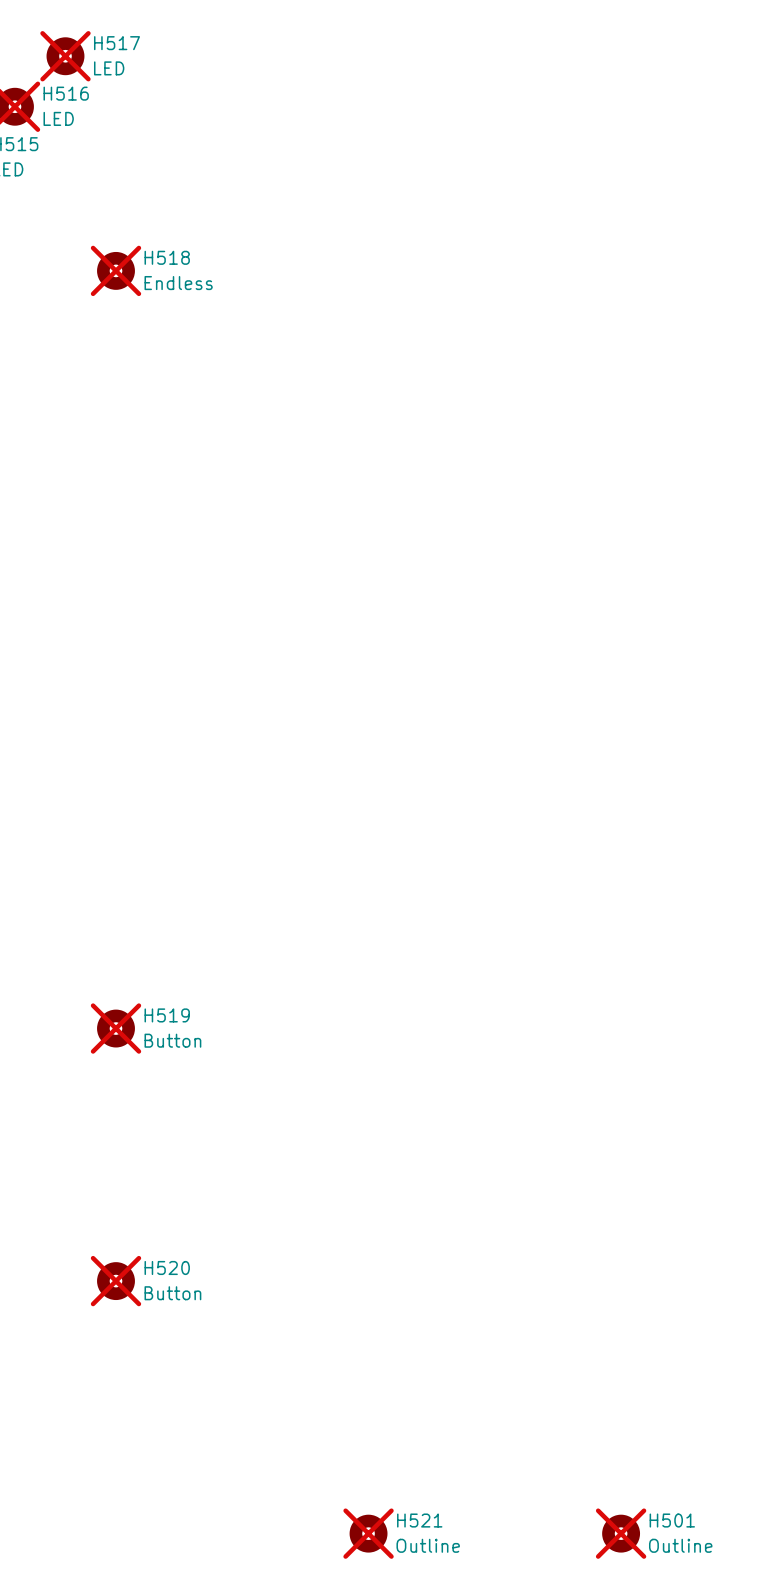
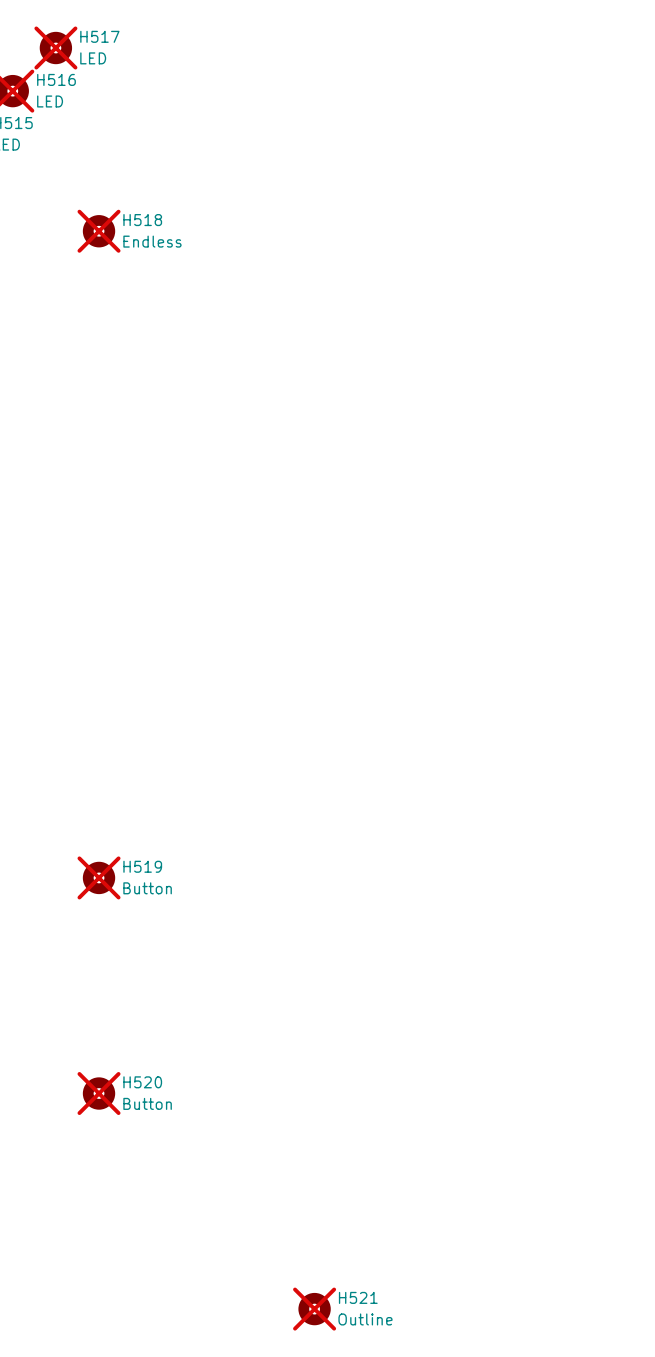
H501: Outline (621, 1533) -> none

